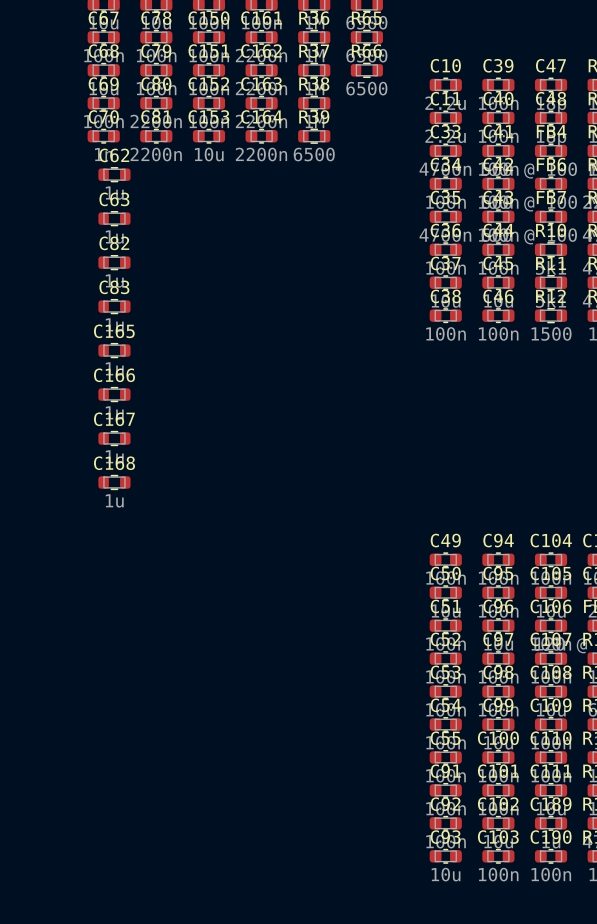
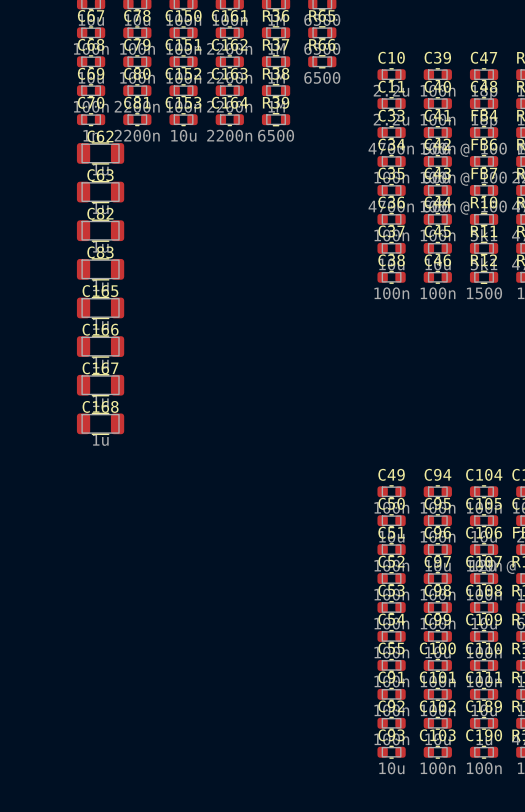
C62 footprint: [98, 167, 131, 183] -> [76, 142, 125, 165]
C63 footprint: [98, 211, 131, 227] -> [76, 180, 125, 204]
C82 footprint: [98, 254, 131, 271] -> [76, 219, 125, 242]
C83 footprint: [98, 298, 131, 315] -> [76, 258, 125, 281]
C165 footprint: [98, 342, 131, 359] -> [76, 296, 125, 320]
C166 footprint: [98, 386, 131, 403] -> [76, 335, 125, 358]
C167 footprint: [98, 430, 131, 447] -> [76, 374, 125, 397]
C168 footprint: [98, 474, 131, 491] -> [76, 412, 125, 436]

